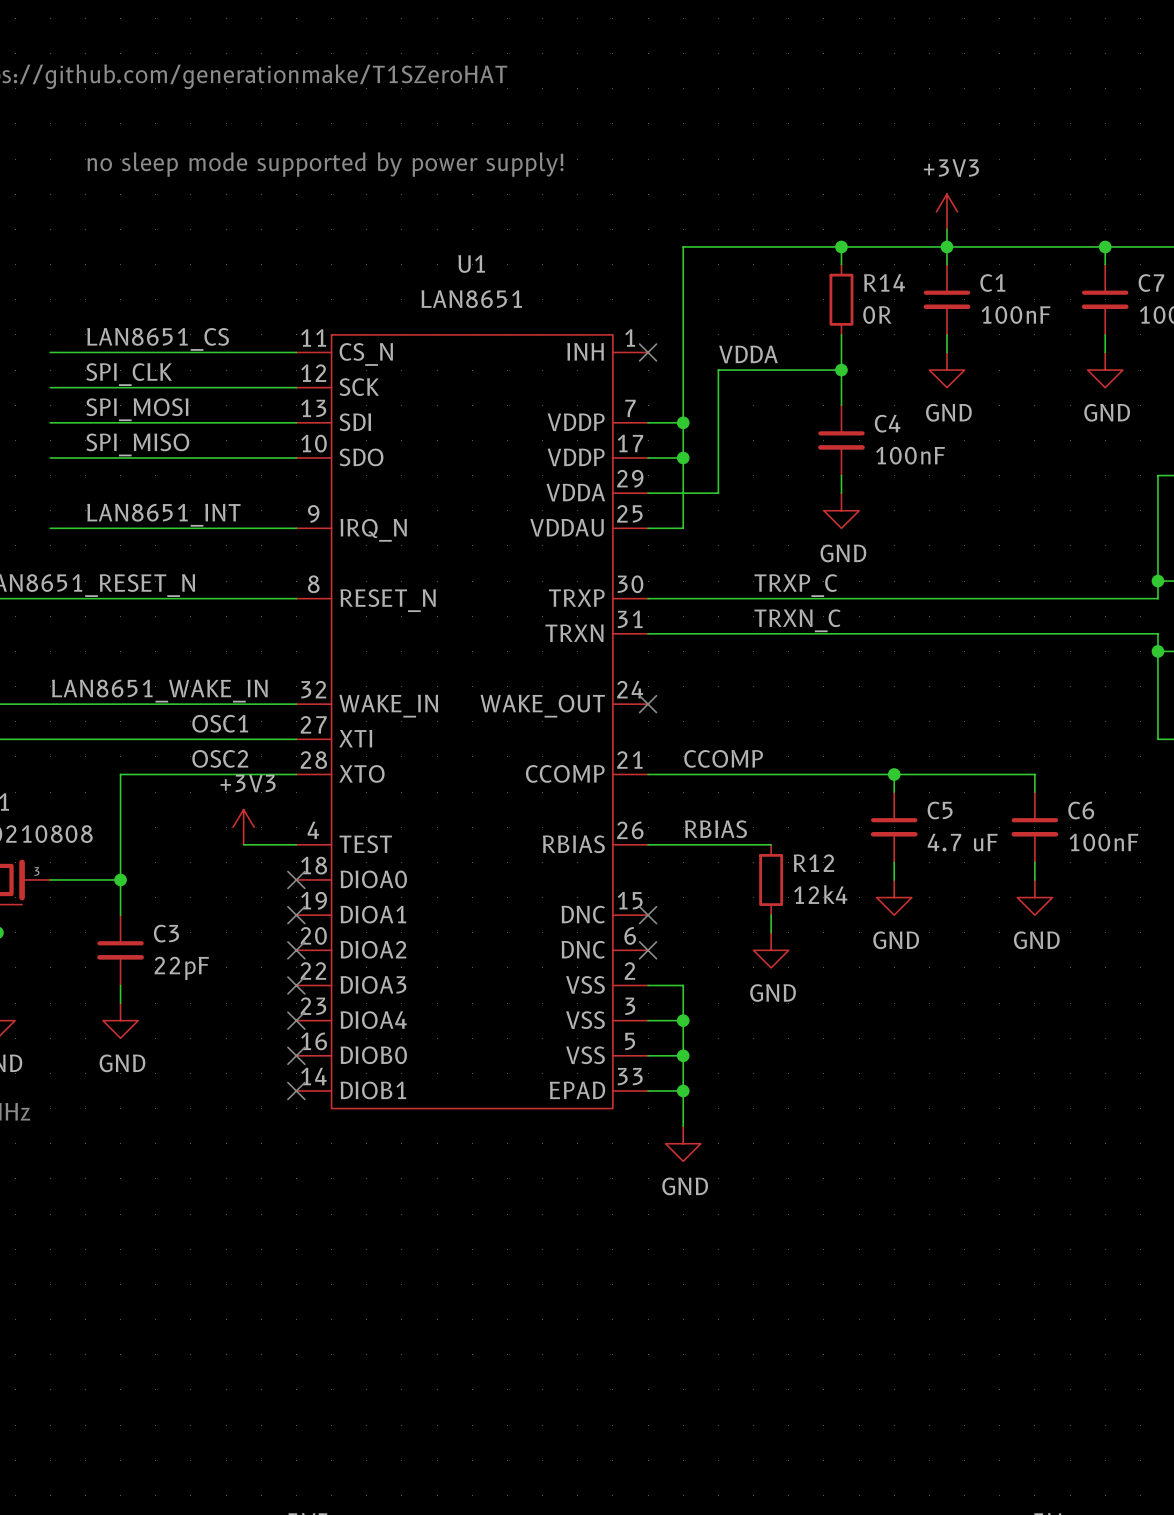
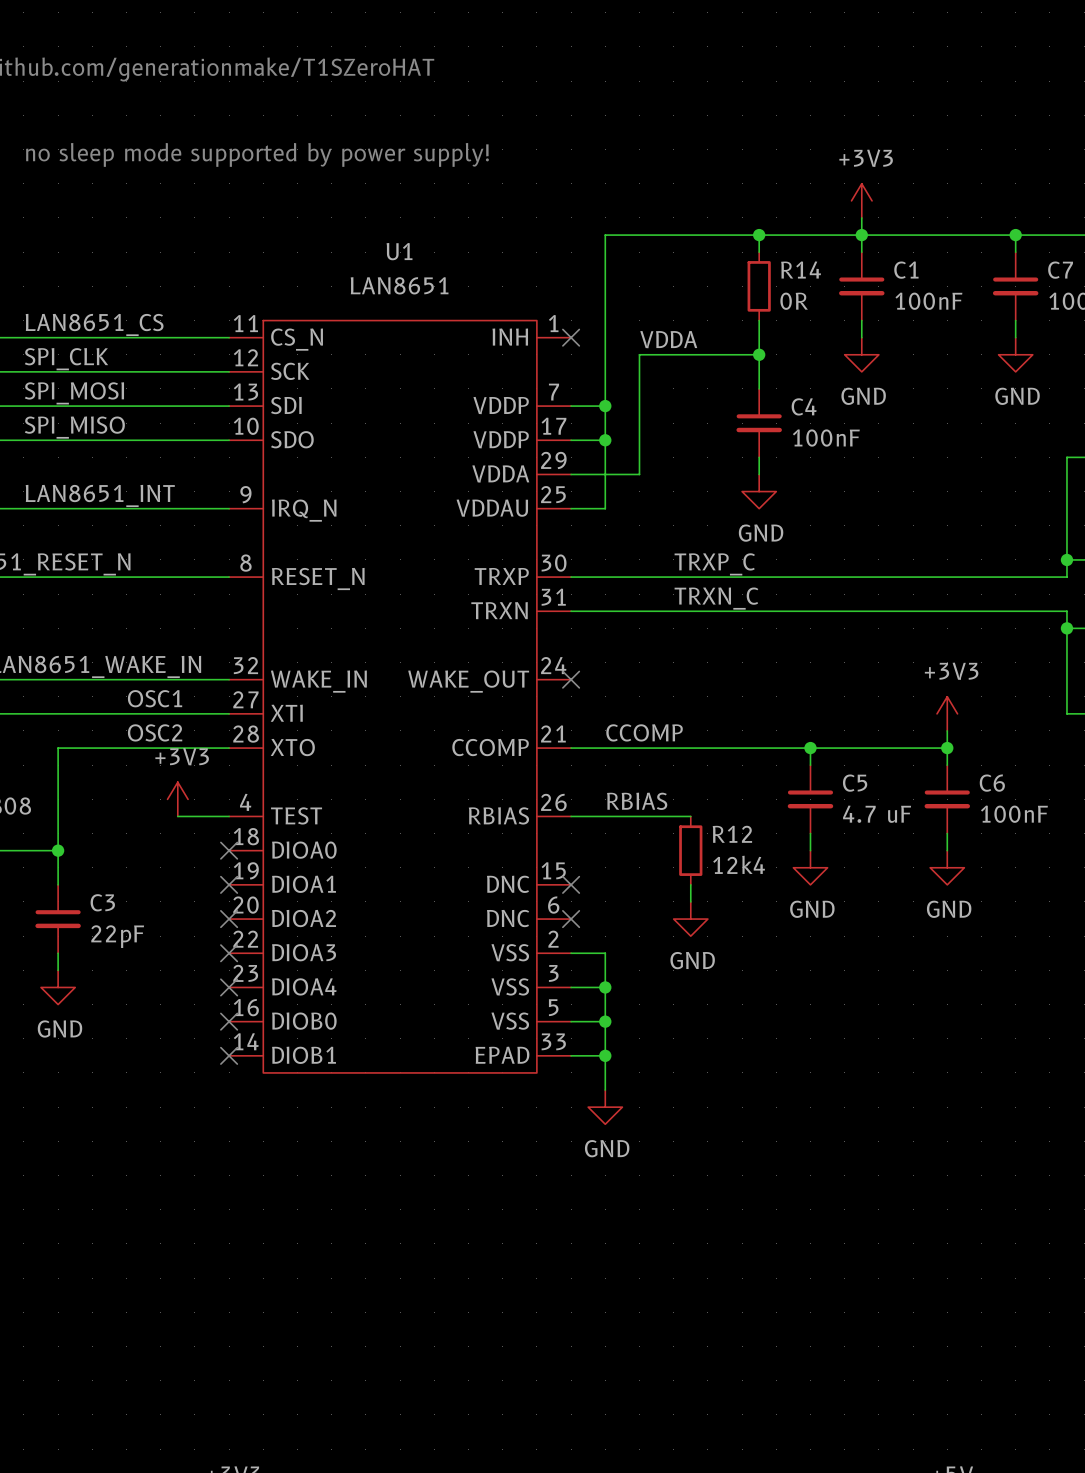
power symbol: none -> +3V3 (947, 713)
wire: none -> (947, 730) (947, 748)
junction: none -> (947, 748)

